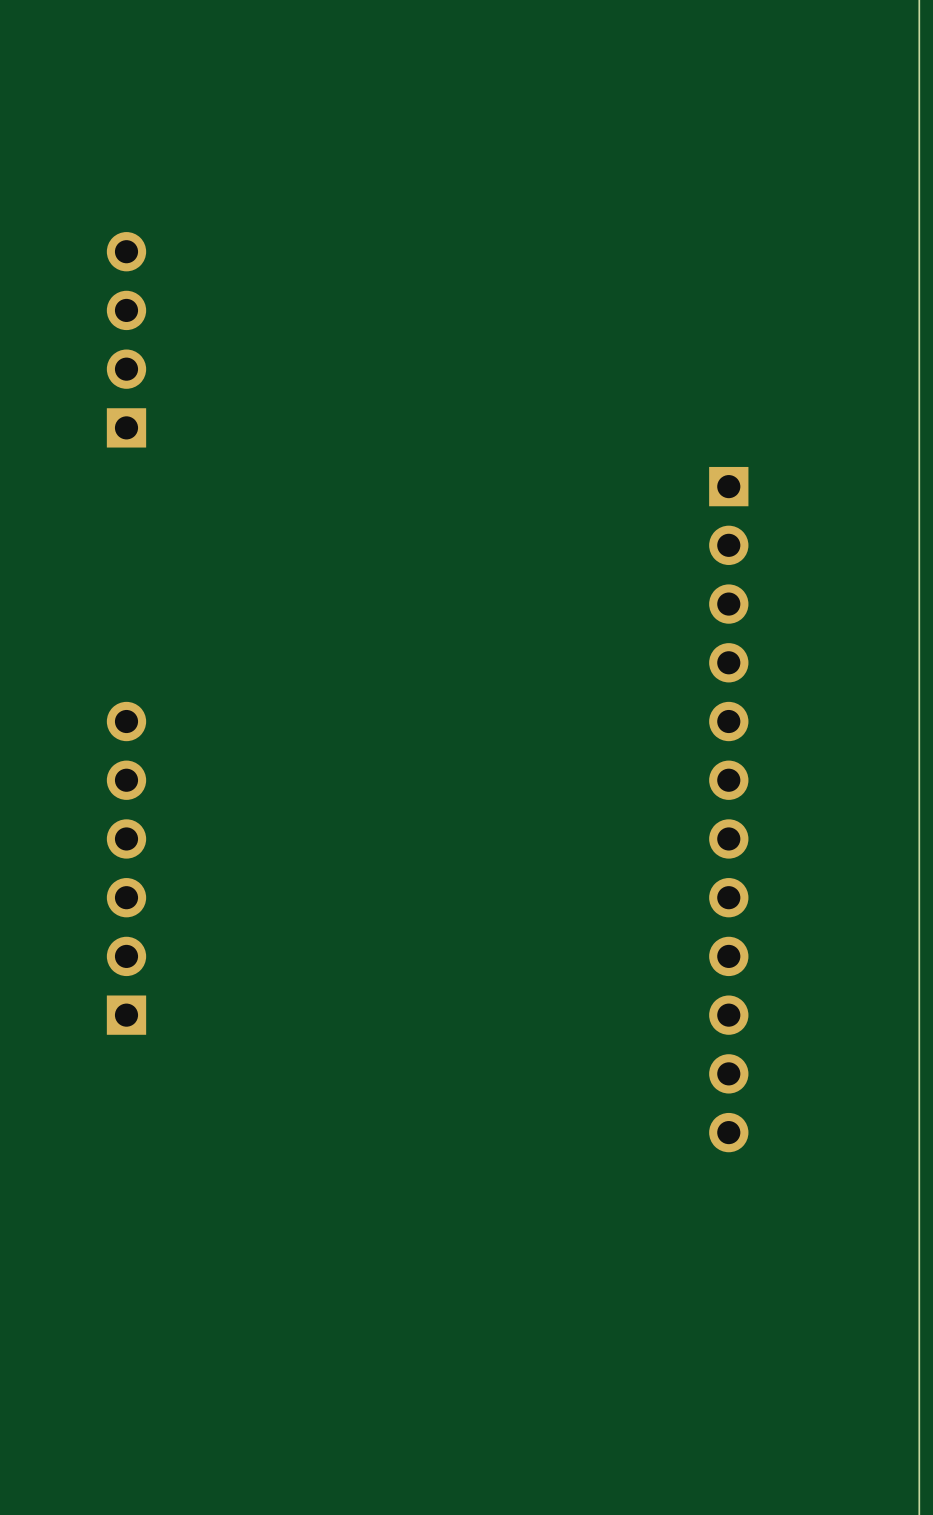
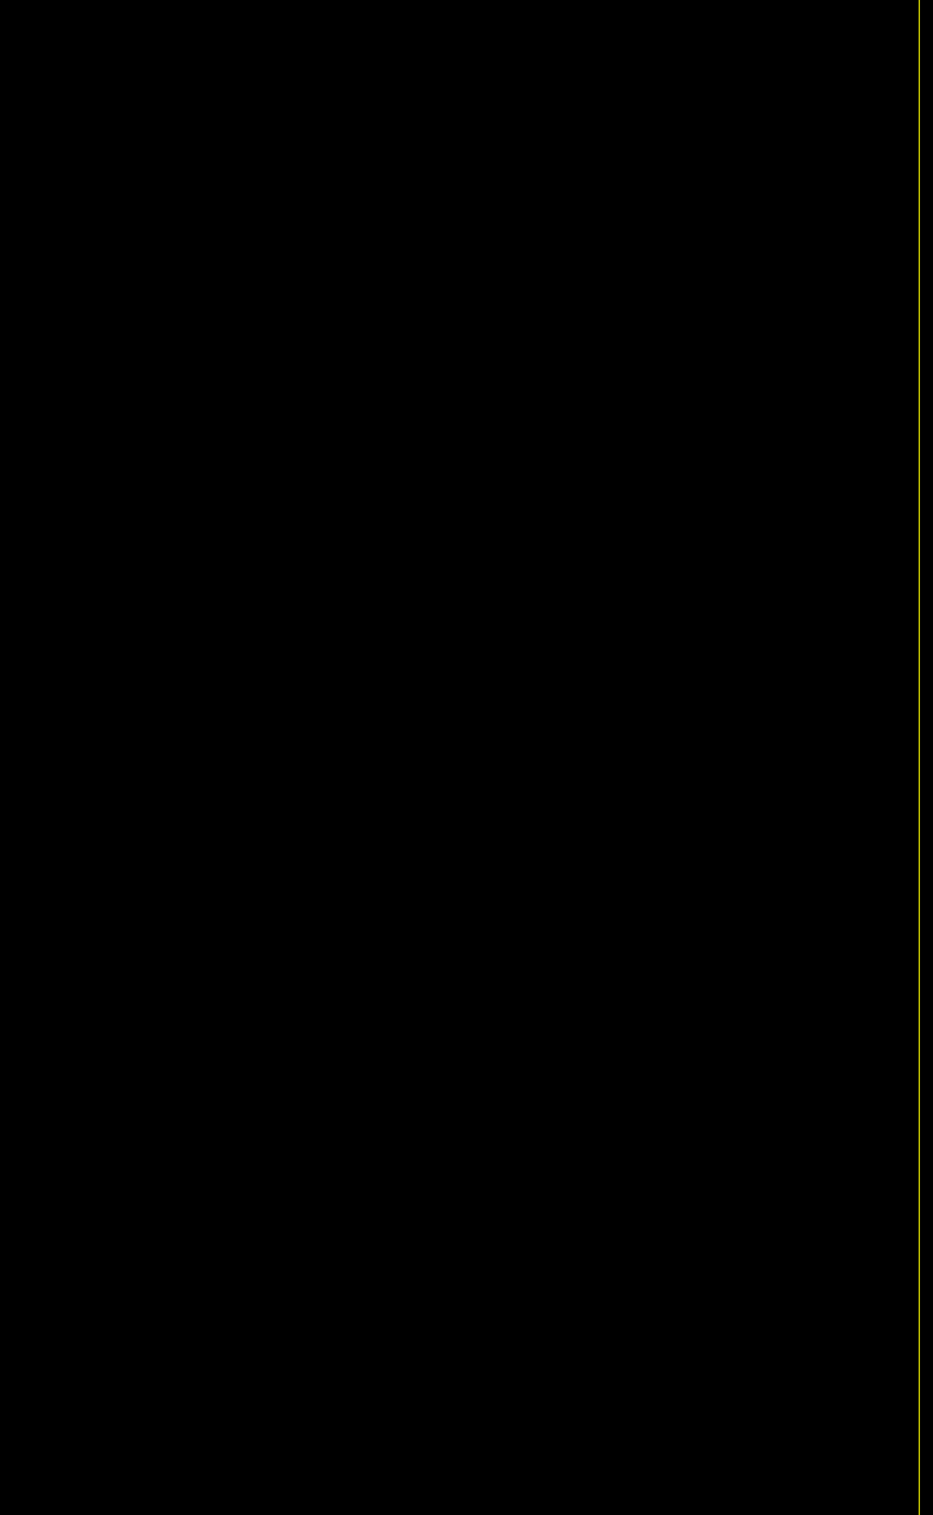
part: (126, 339) -> none
part: (728, 809) -> none
part: (126, 868) -> none

